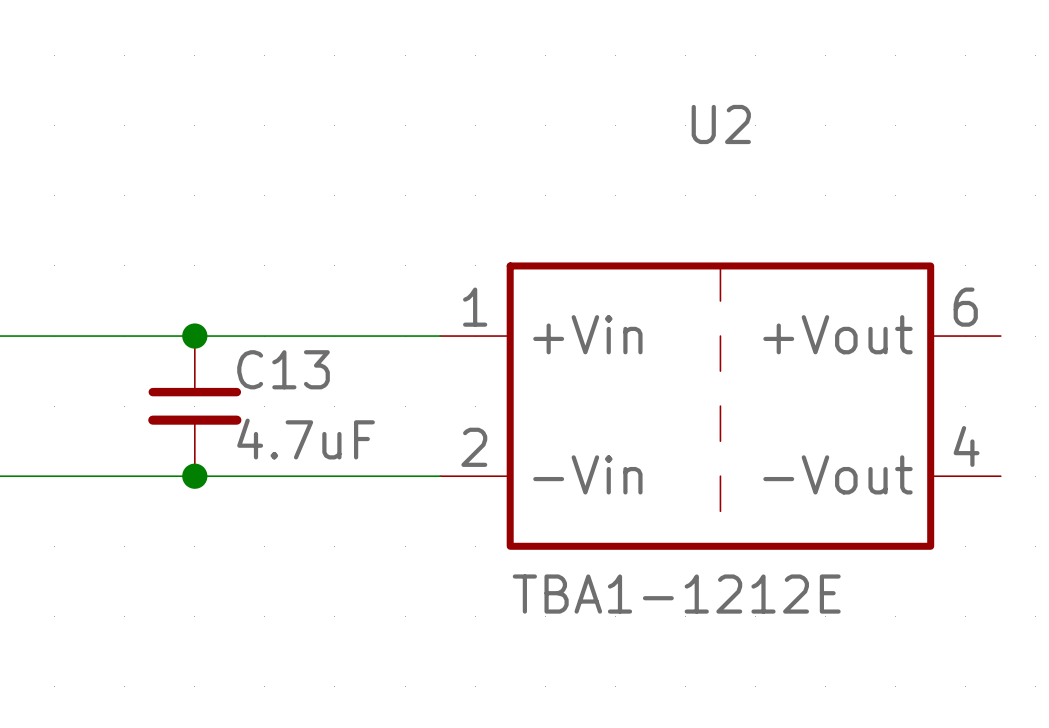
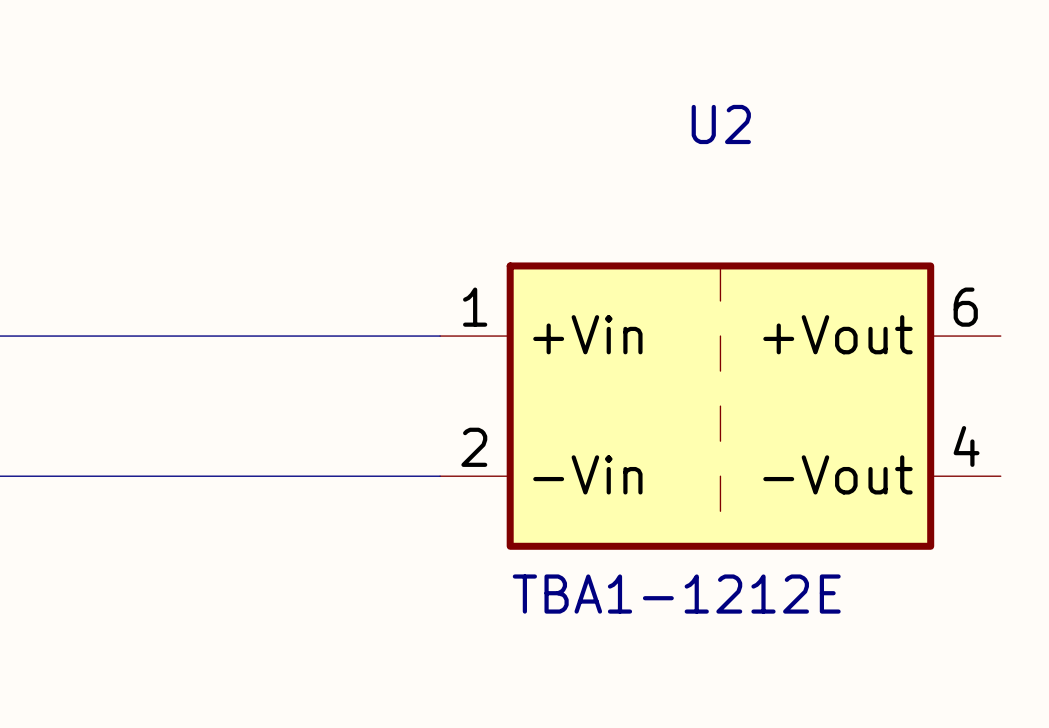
junction: (194, 336) -> none
C13: 4.7uF (194, 406) -> none
junction: (194, 476) -> none

